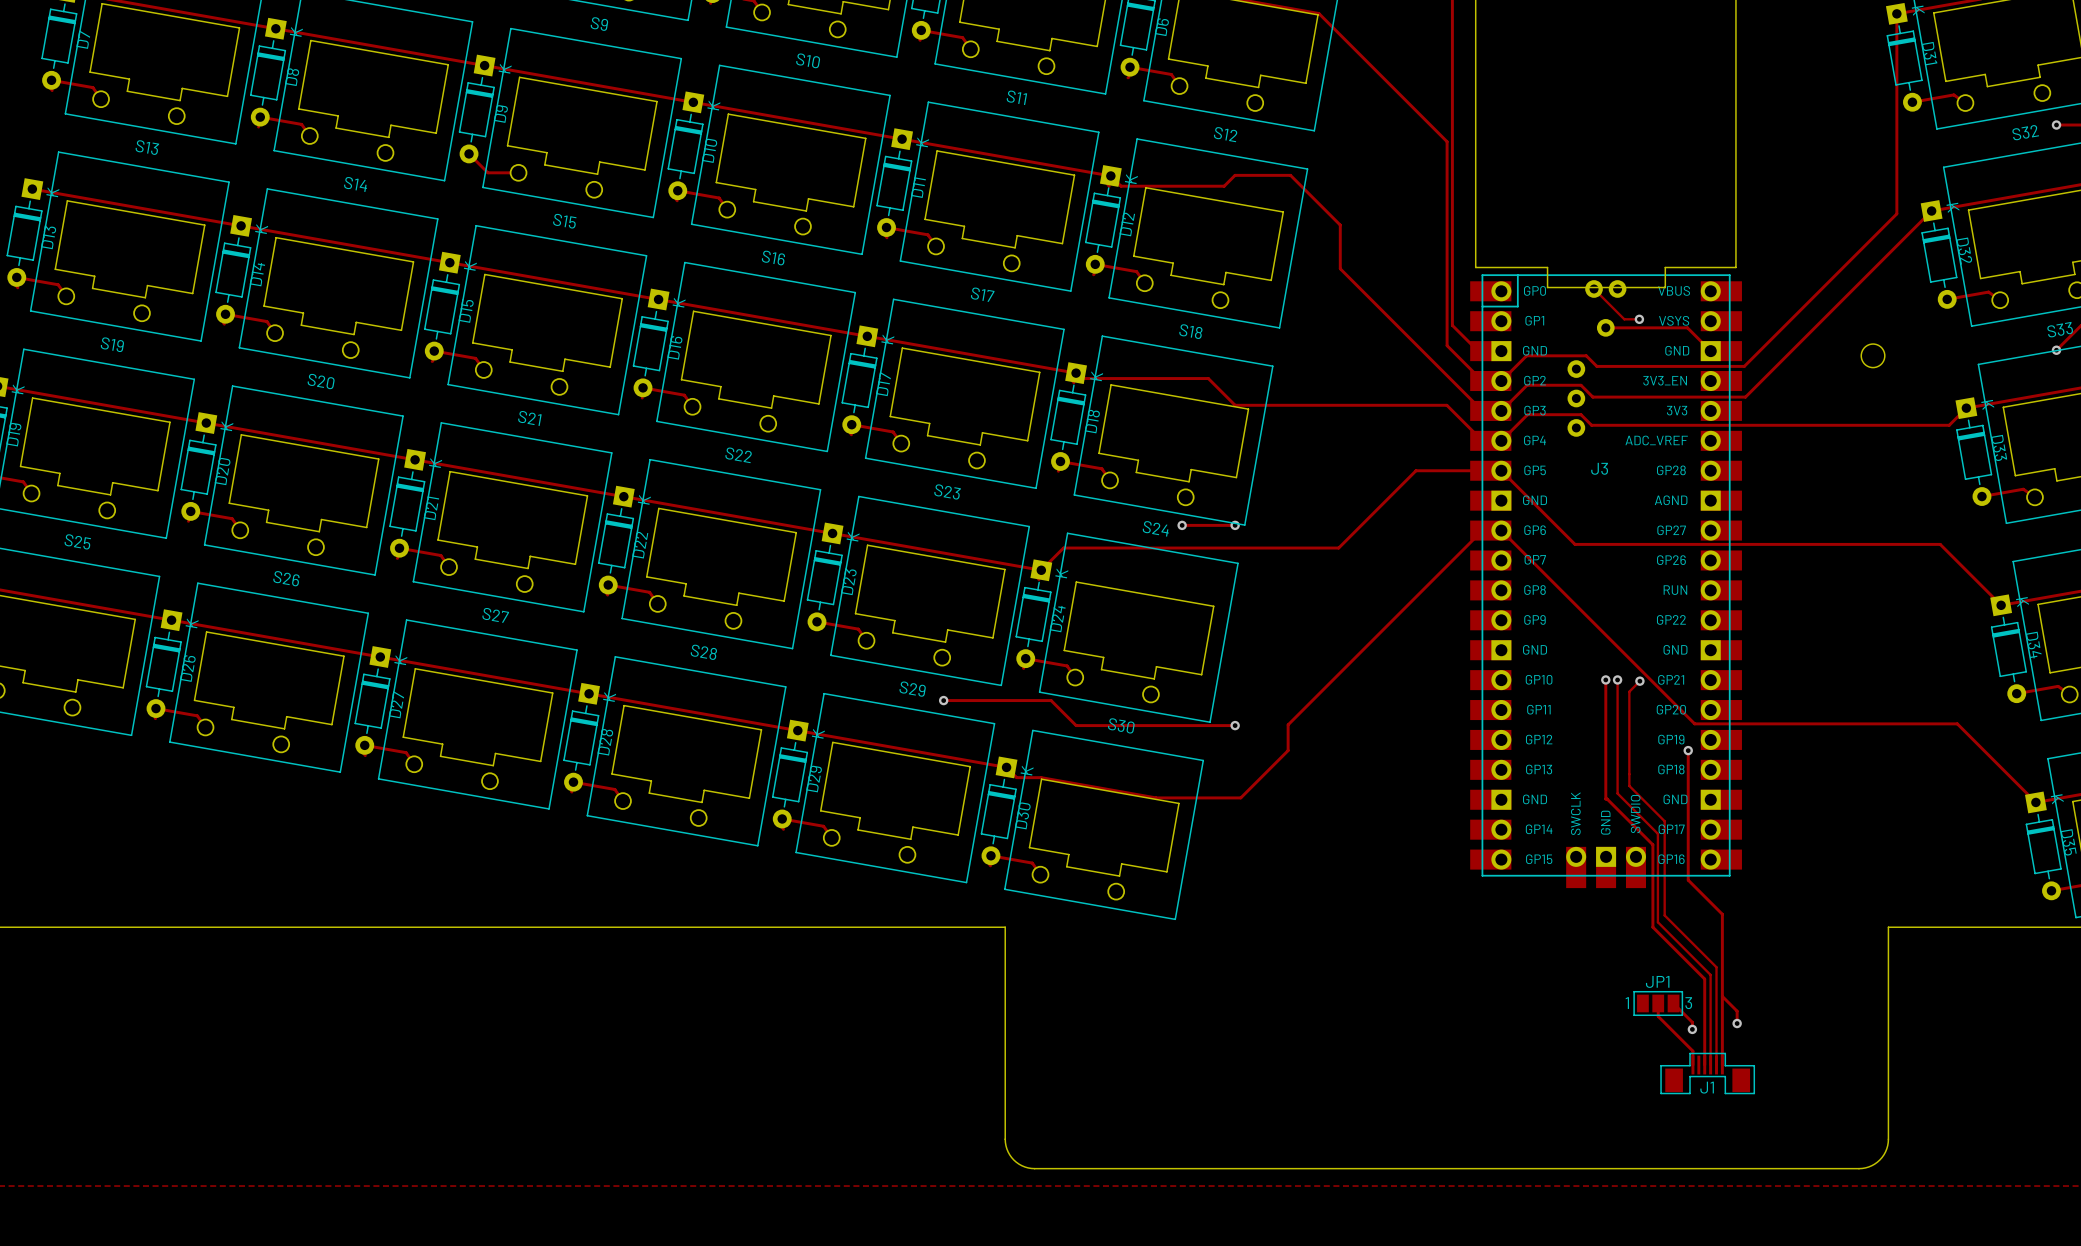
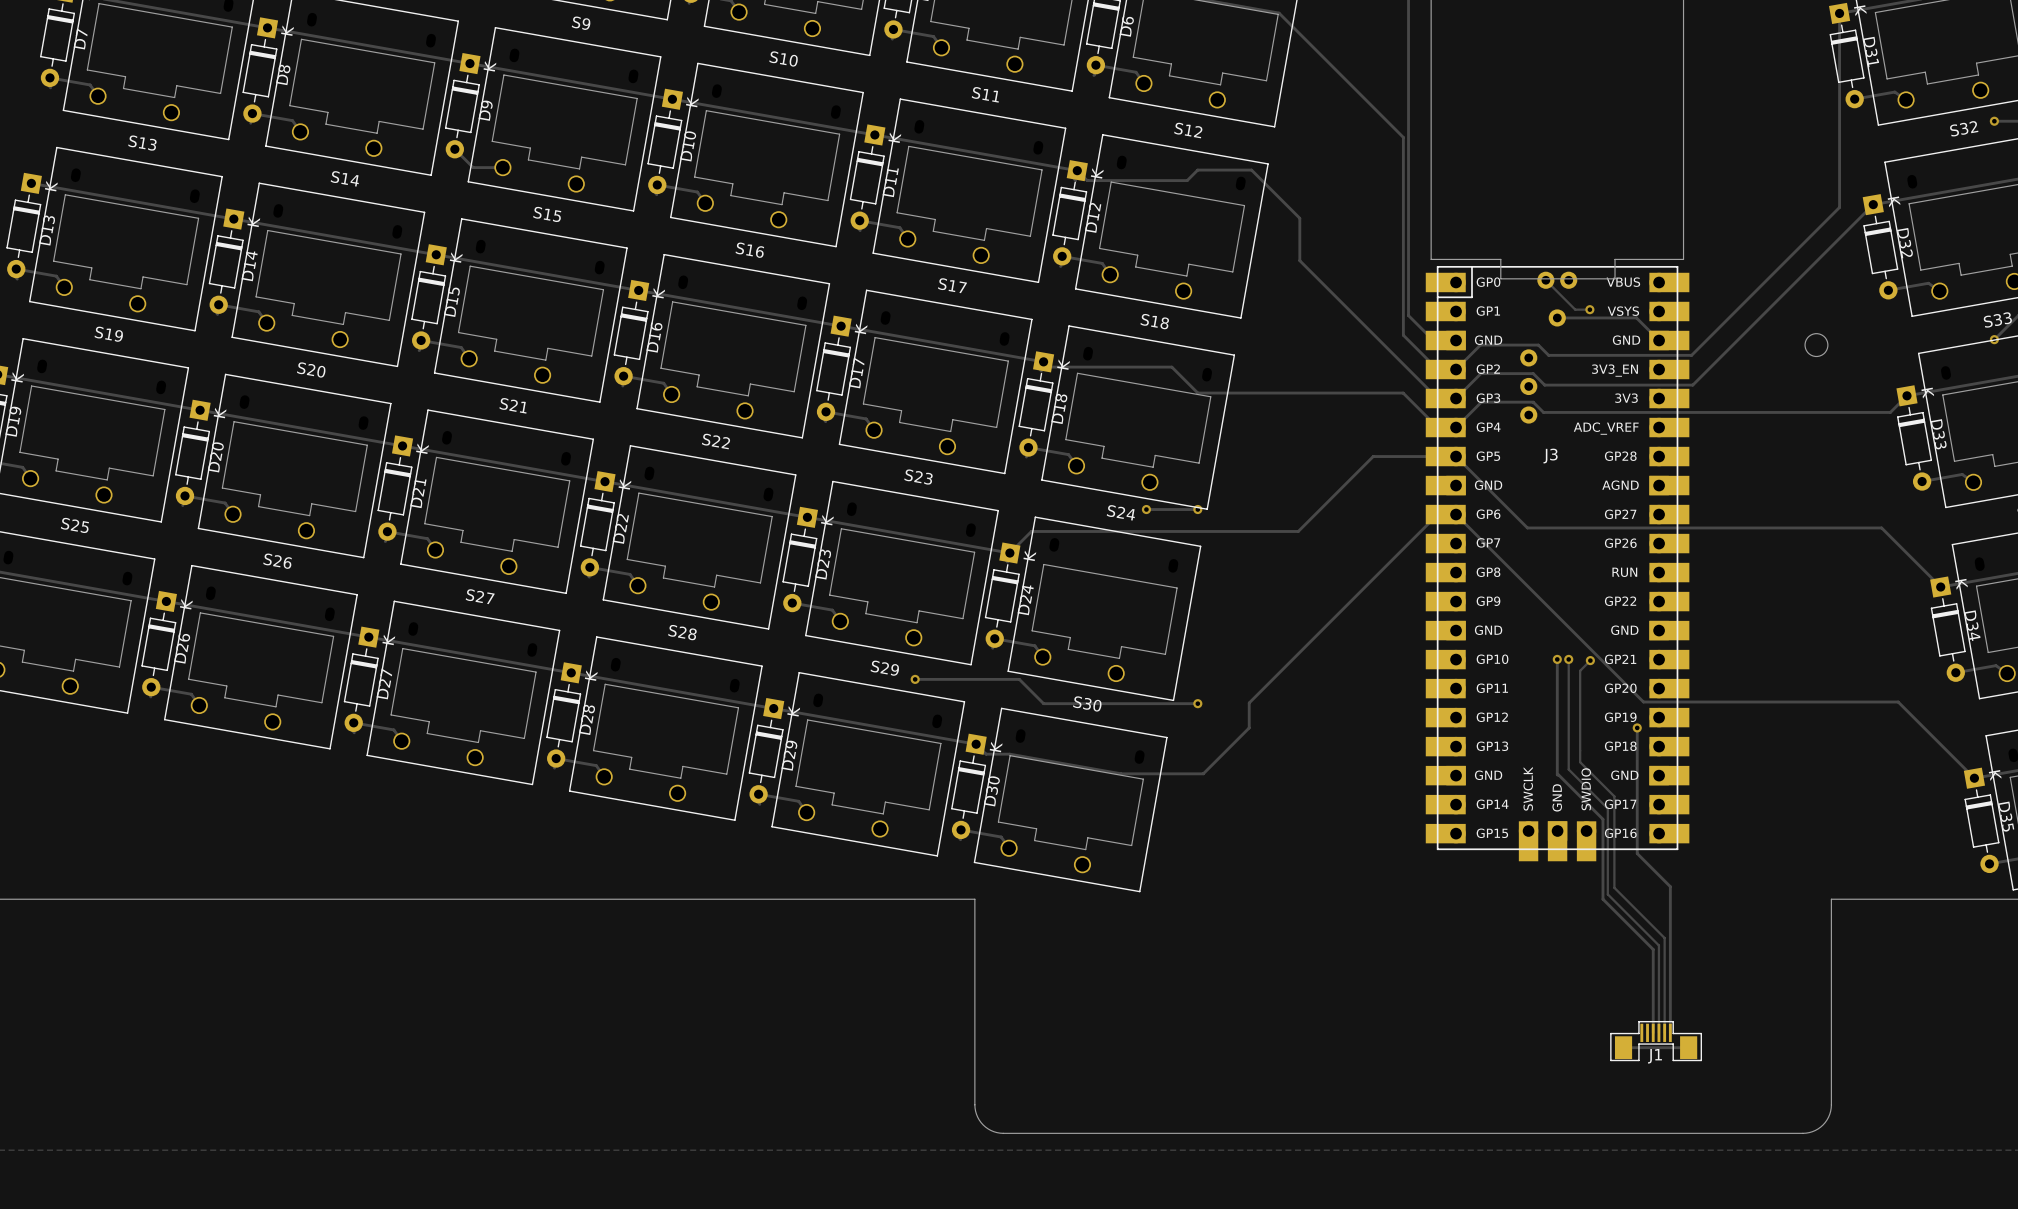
track: (1722, 996) (1737, 1011) (1737, 1023) -> none
track: (1658, 1003) (1658, 1016) (1692, 1051) (1692, 1065) -> none
JP1: (1658, 1003) -> none
track: (1673, 1003) (1692, 1022) (1692, 1029) -> none
via: (1737, 1023) -> none
via: (1692, 1029) -> none
track: none -> (1623, 1047) (1688, 1047)

